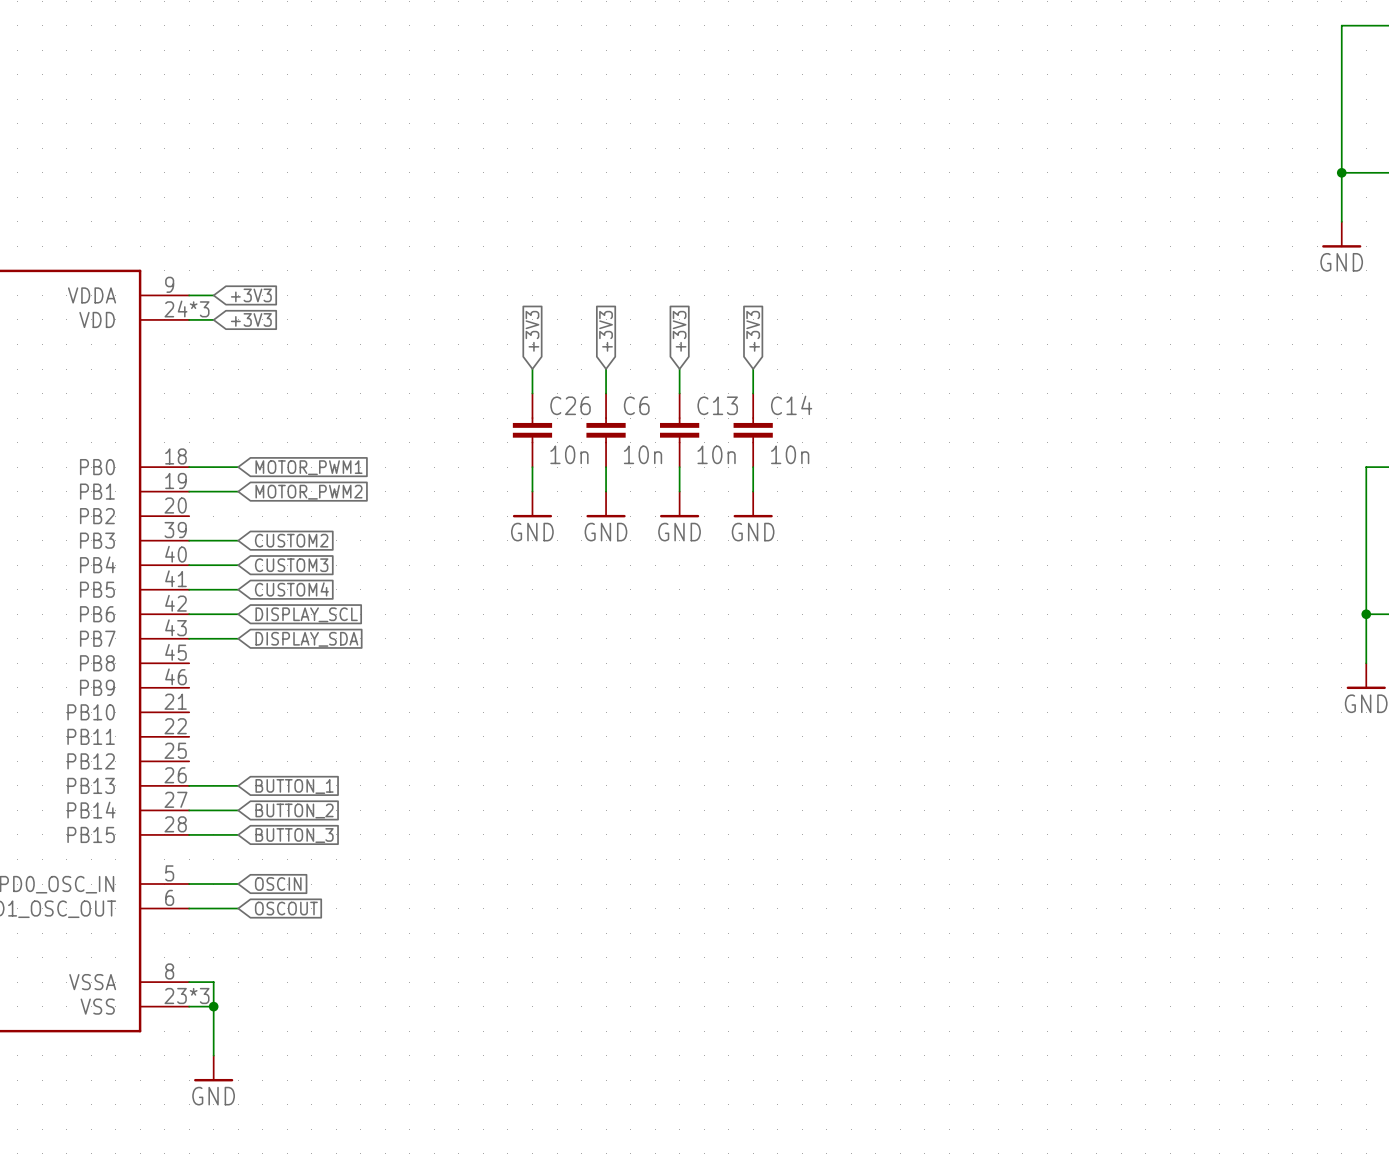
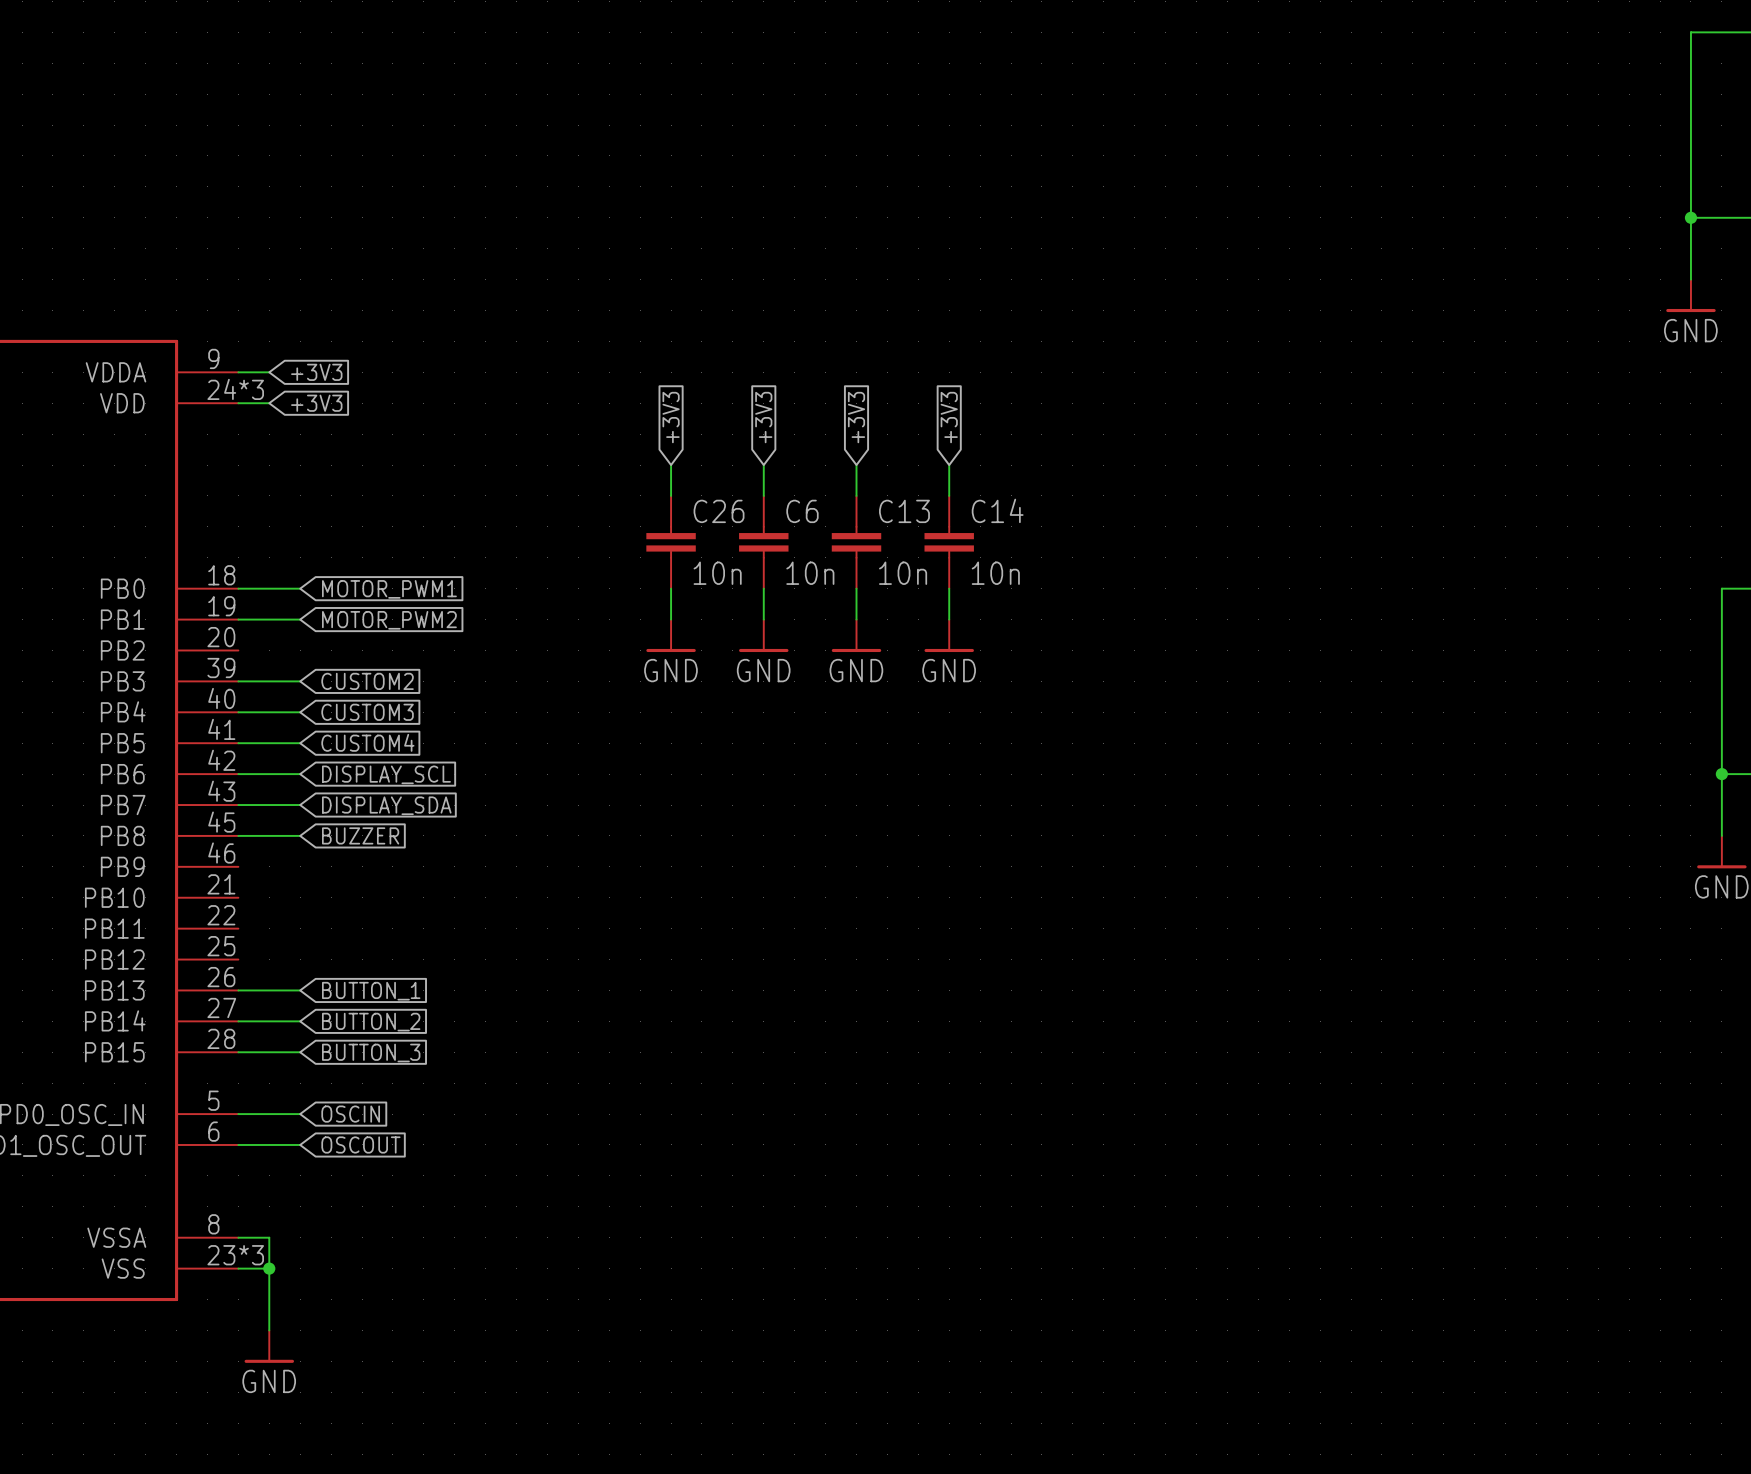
wire: none -> (238, 835) (300, 835)
global label: none -> BUZZER (360, 835)

